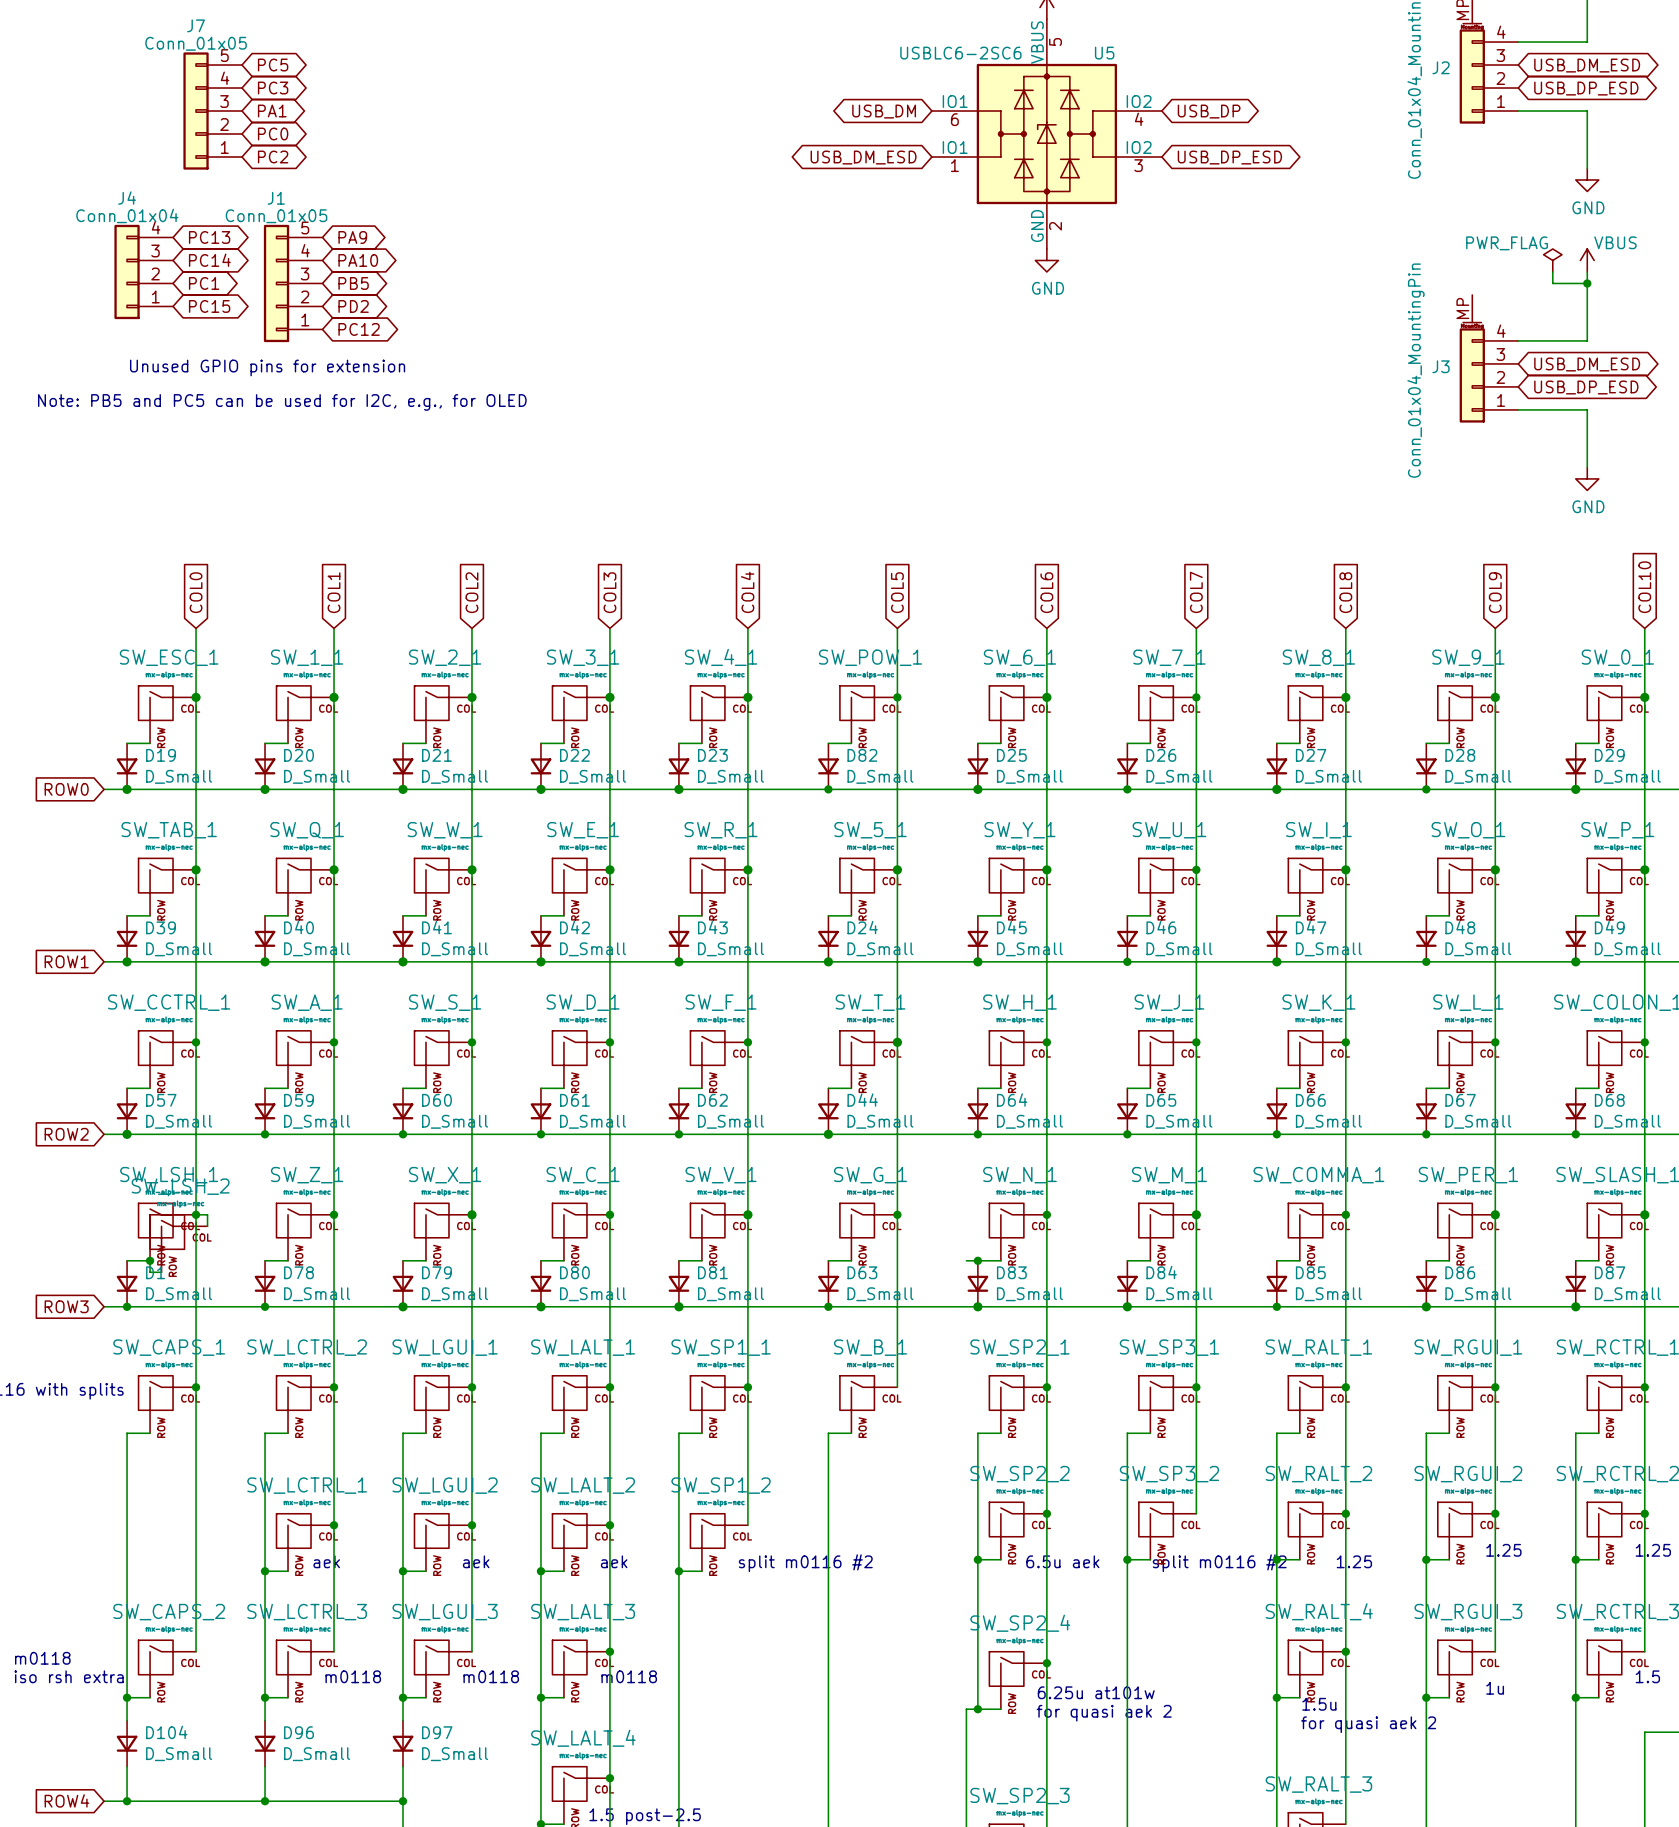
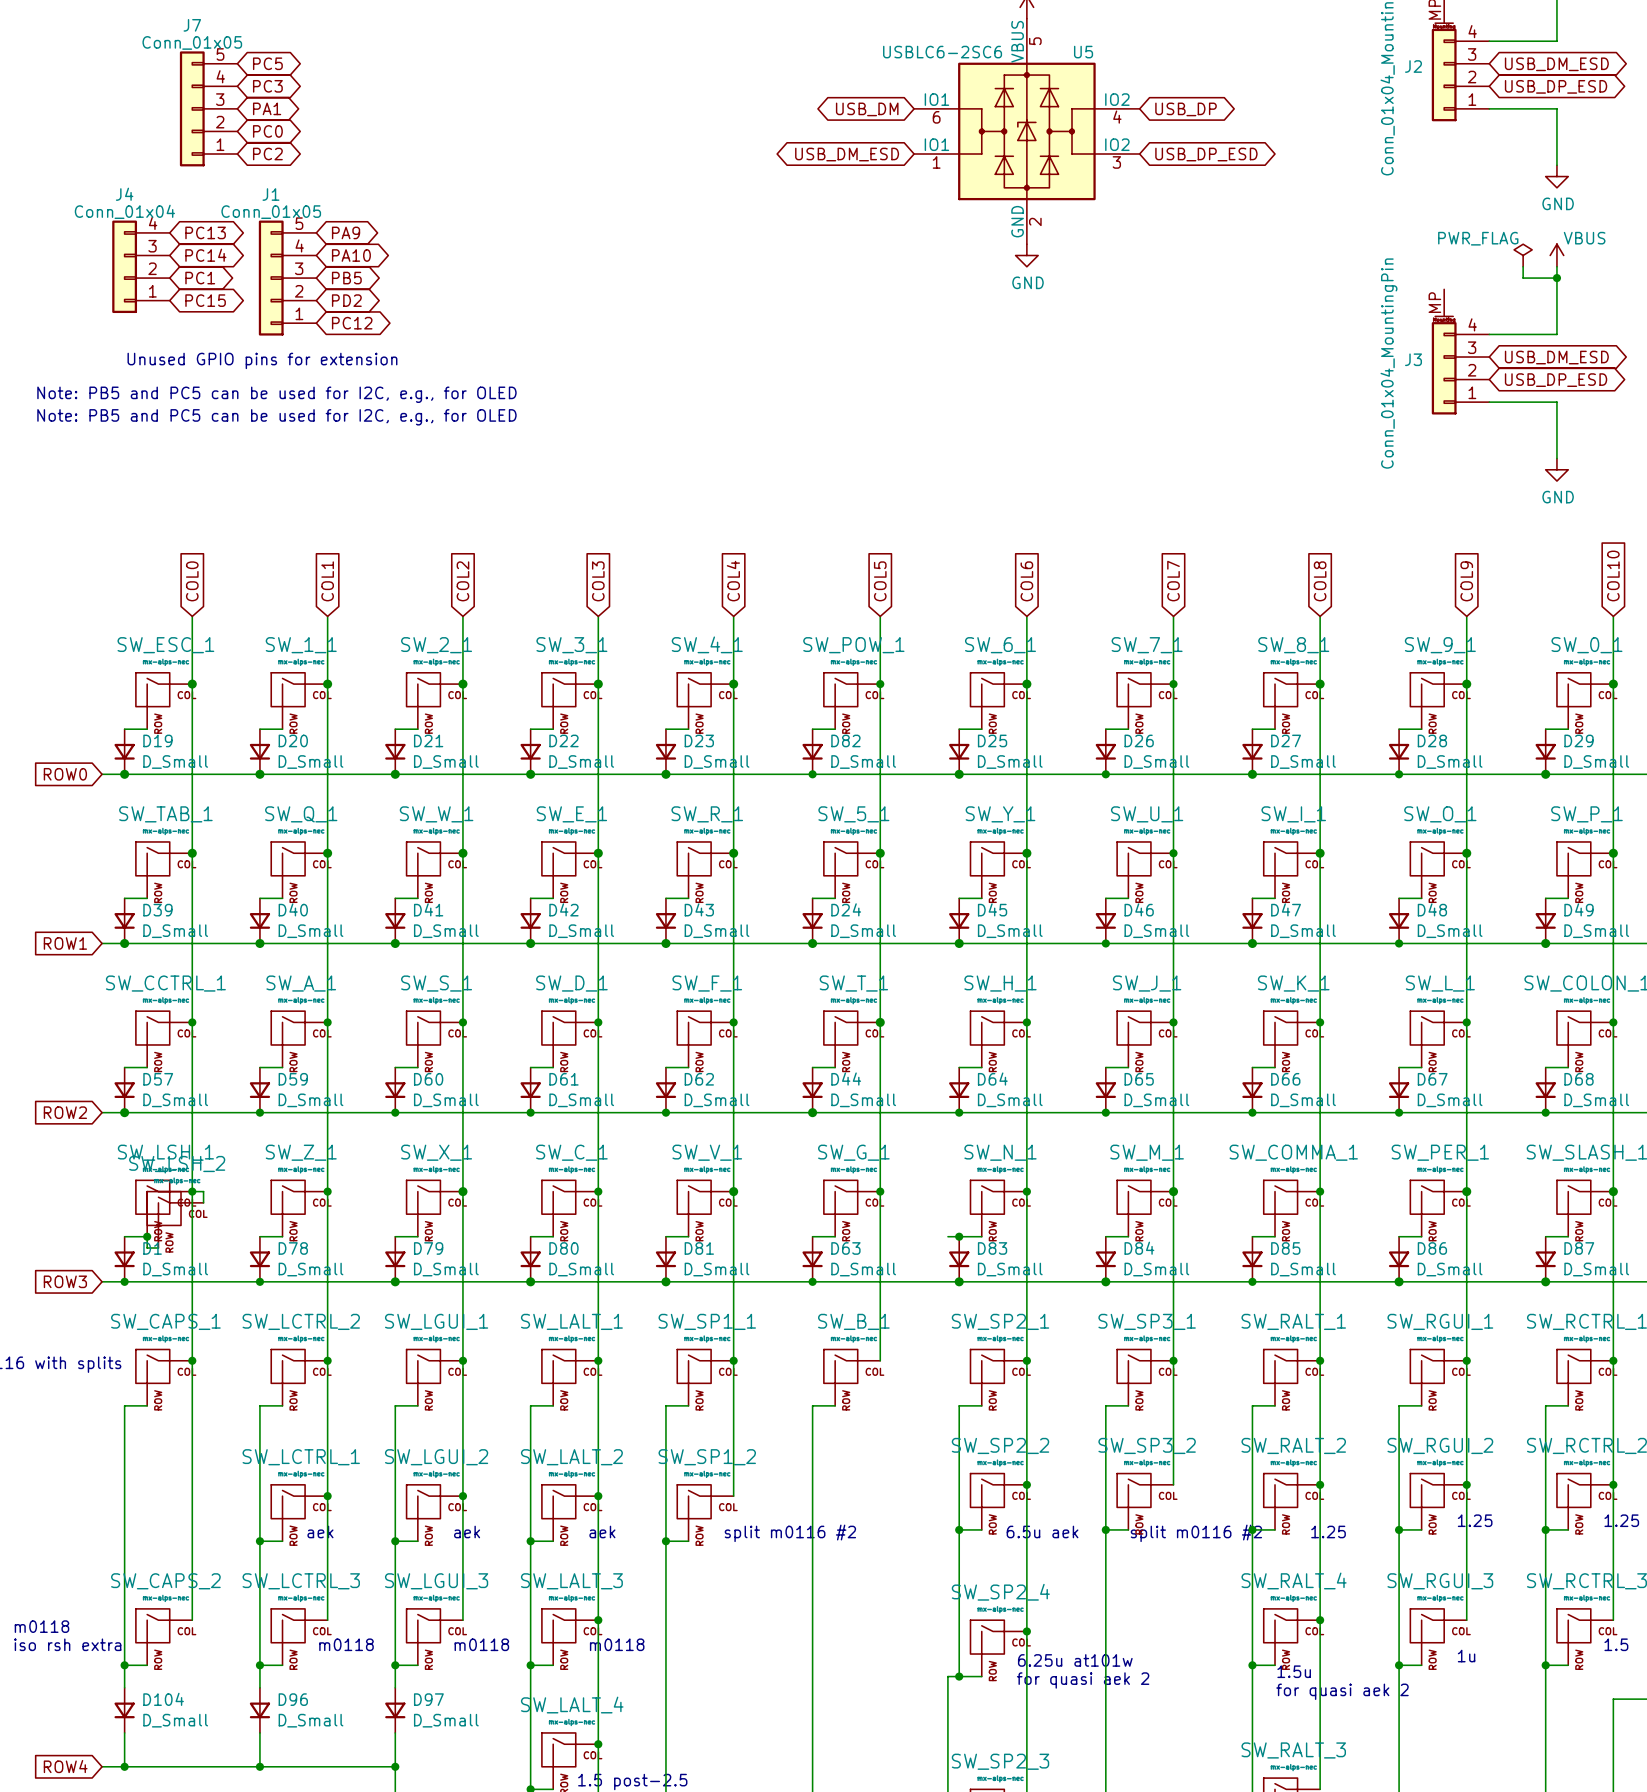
text: none -> Note: PB5 and PC5 can be used for I2C, e.g., for OLED (276, 417)

